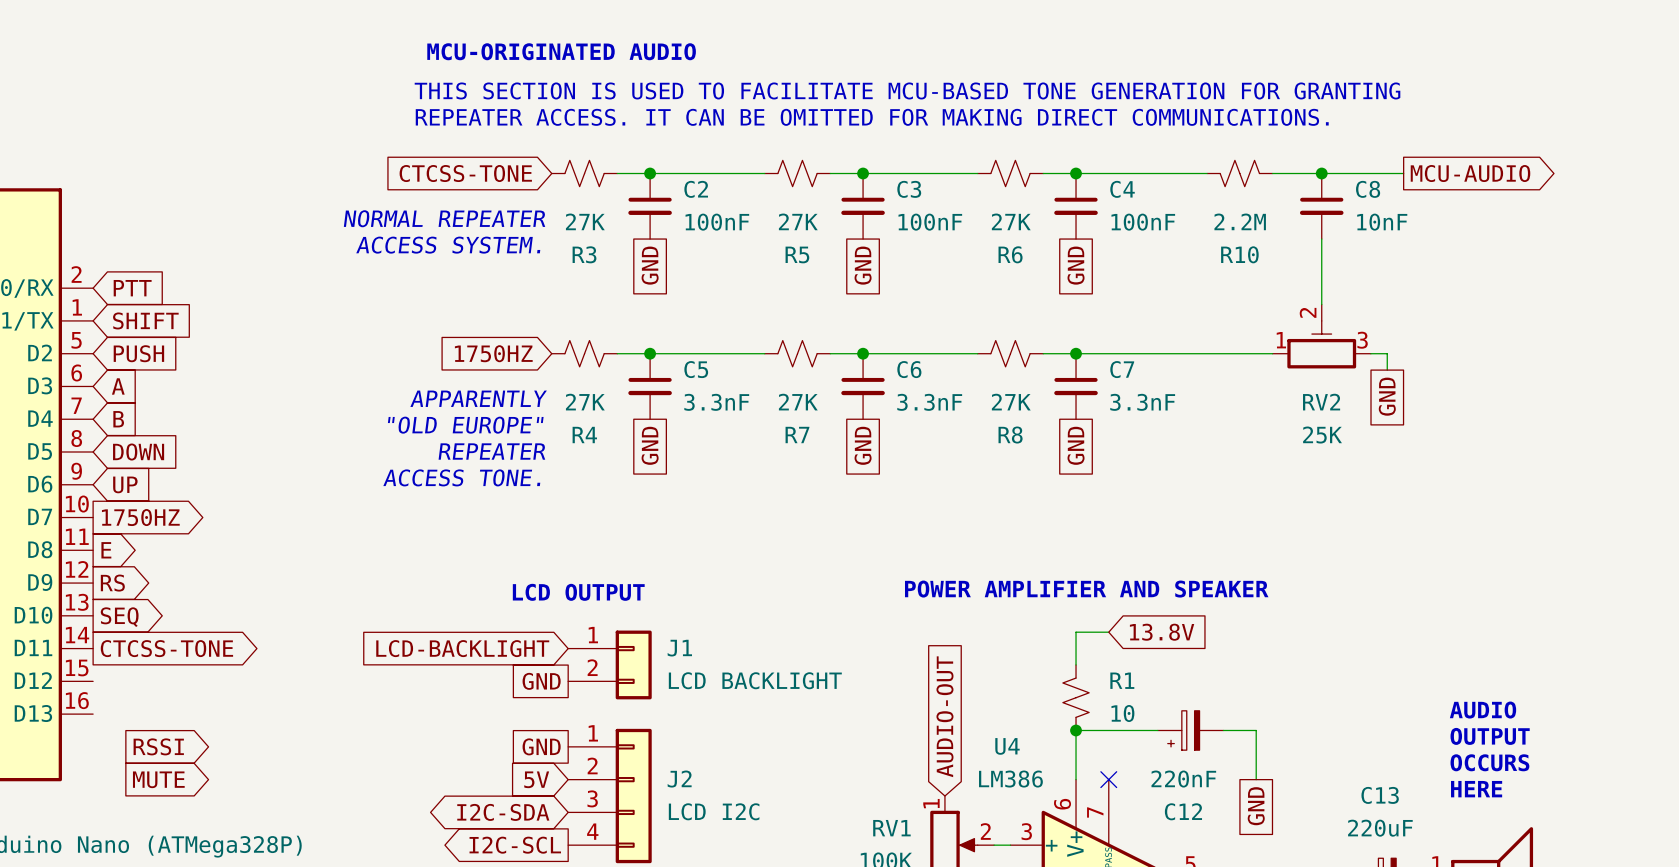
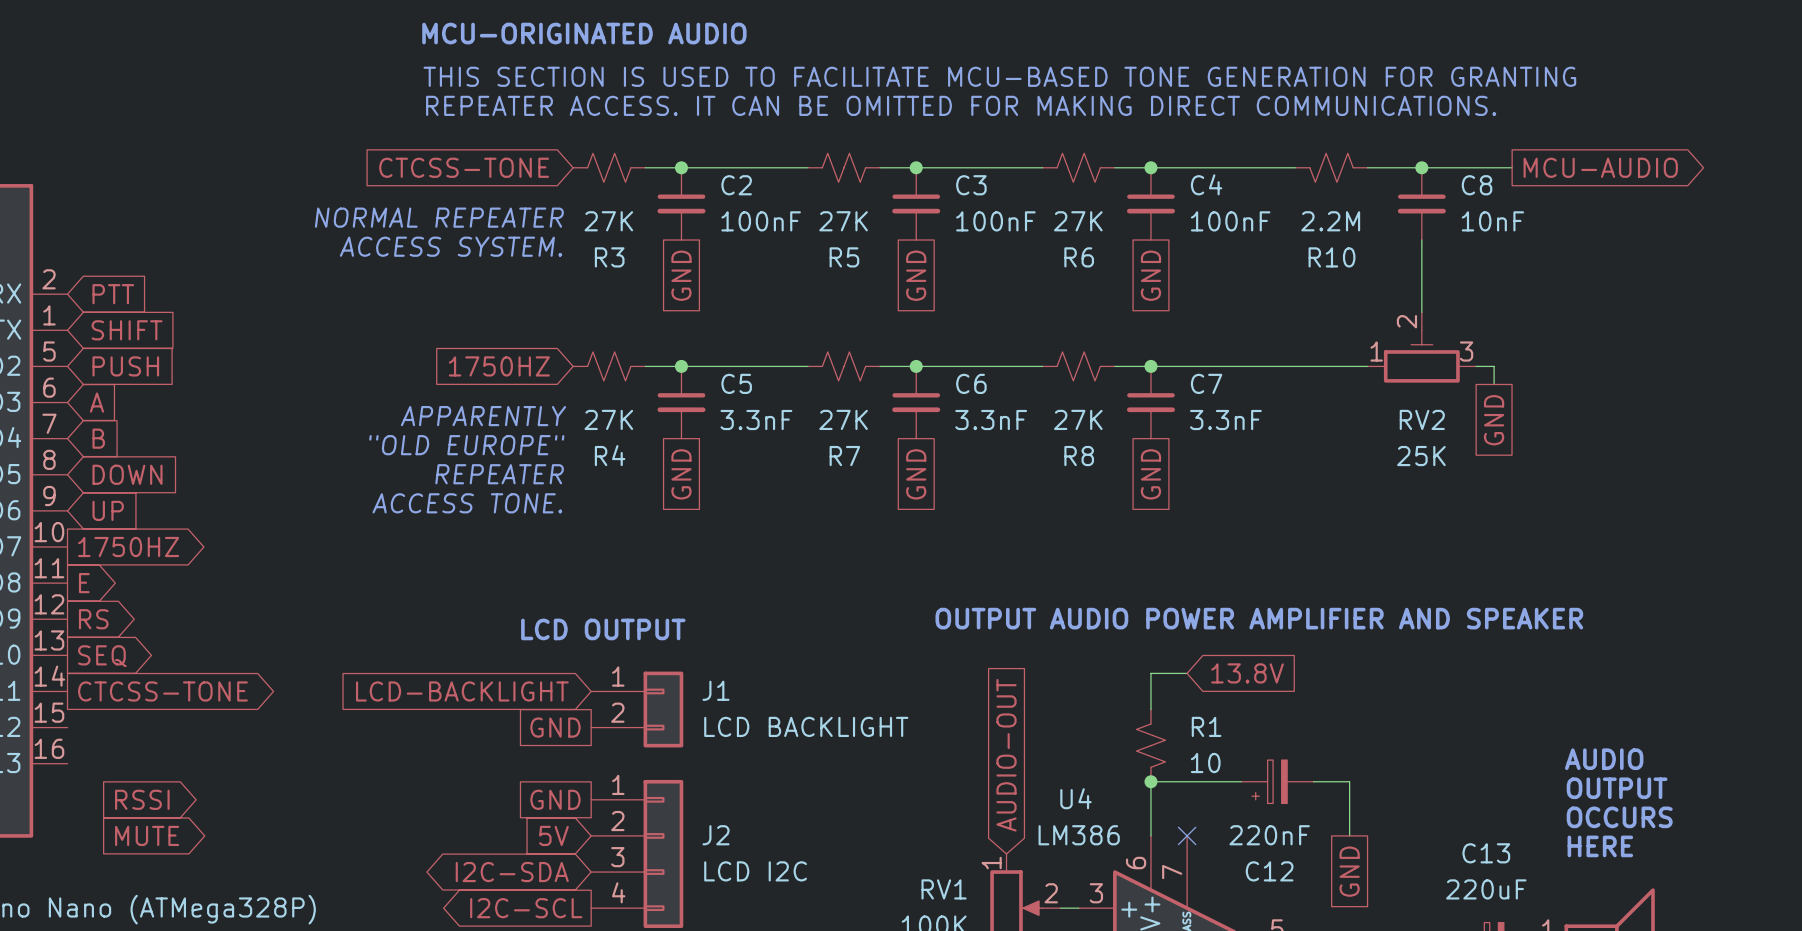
text: POWER AMPLIFIER AND SPEAKER (1086, 589) -> OUTPUT AUDIO POWER AMPLIFIER AND SPEAKER (1259, 618)

